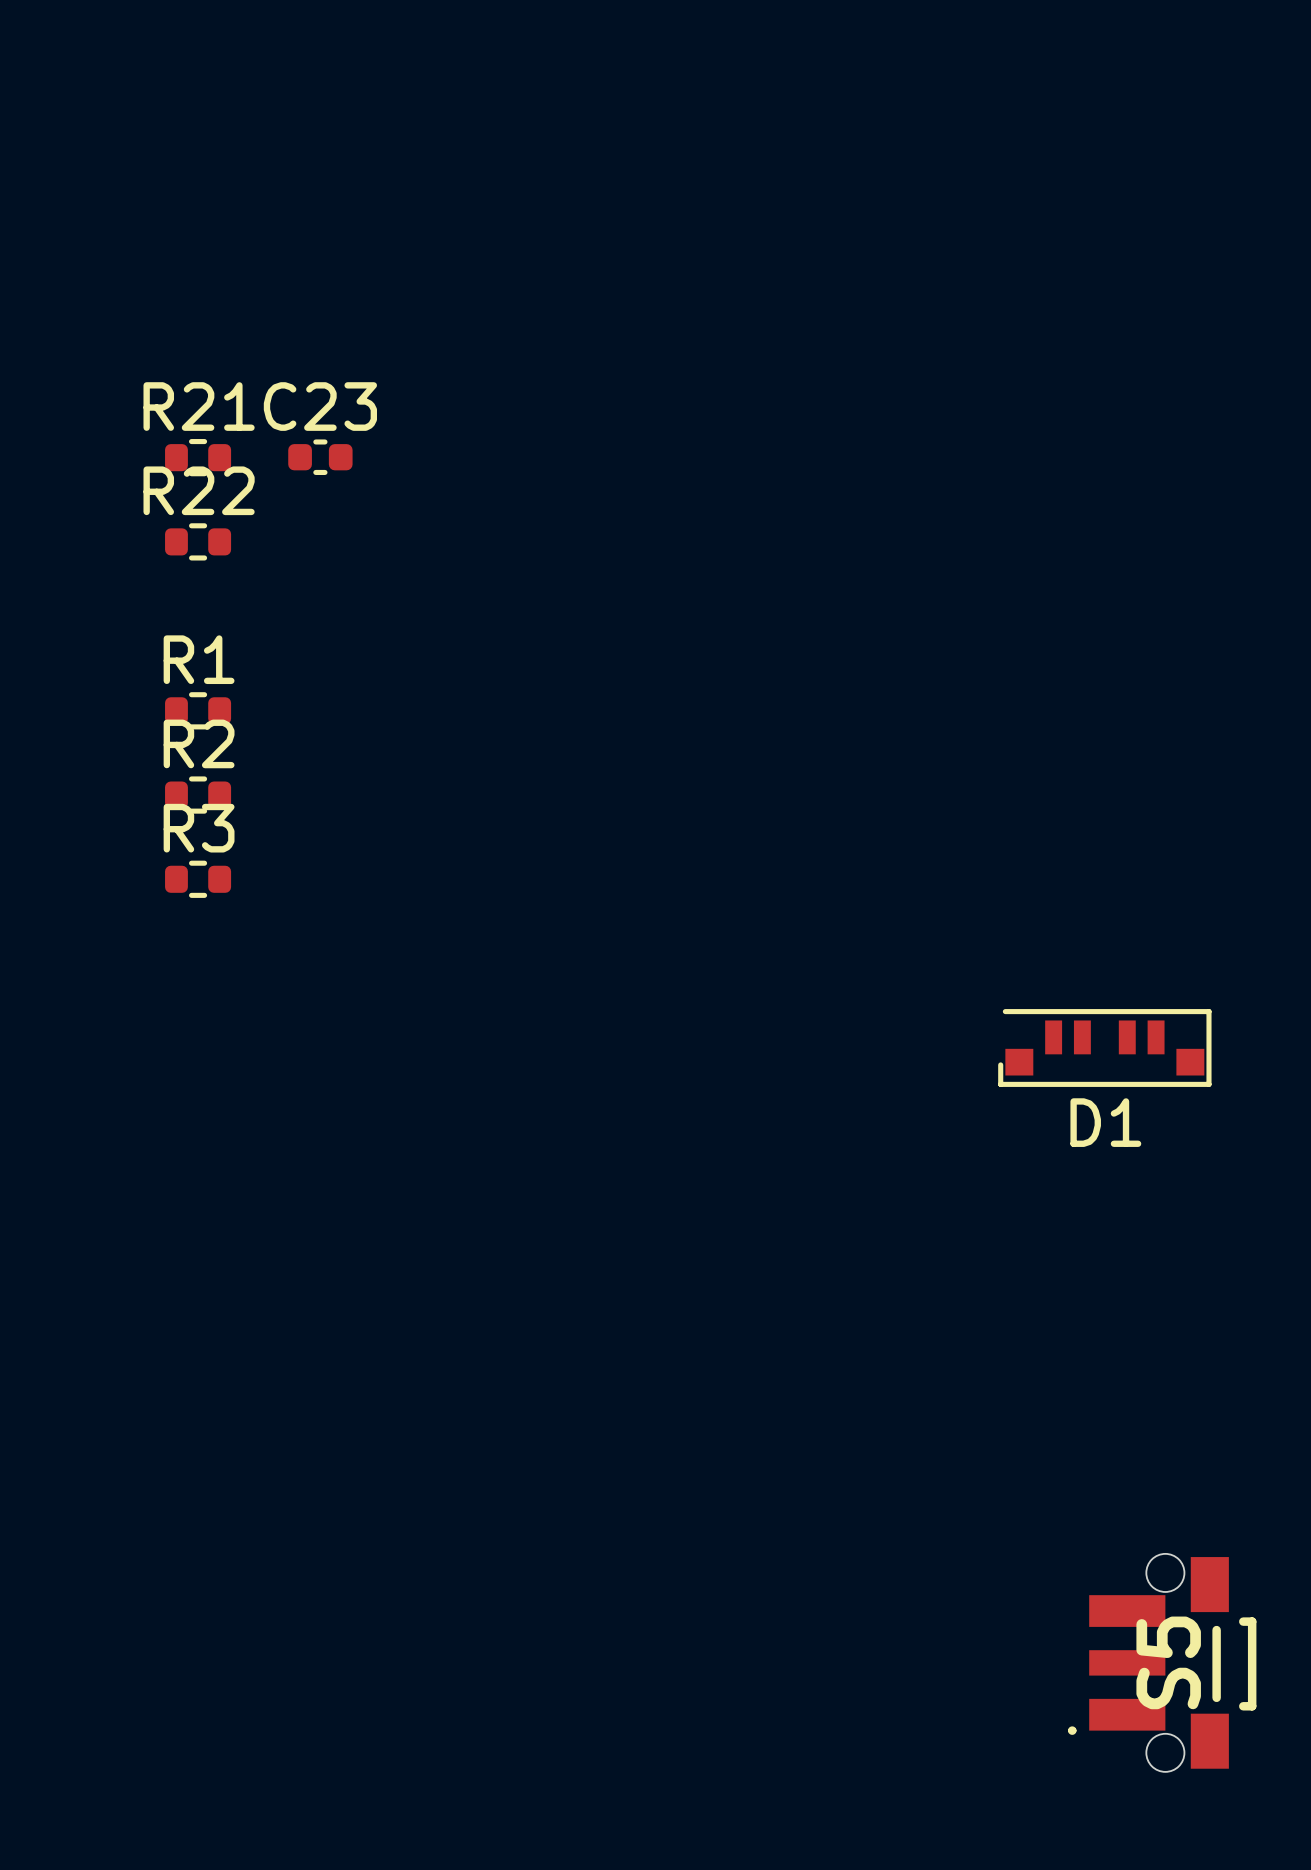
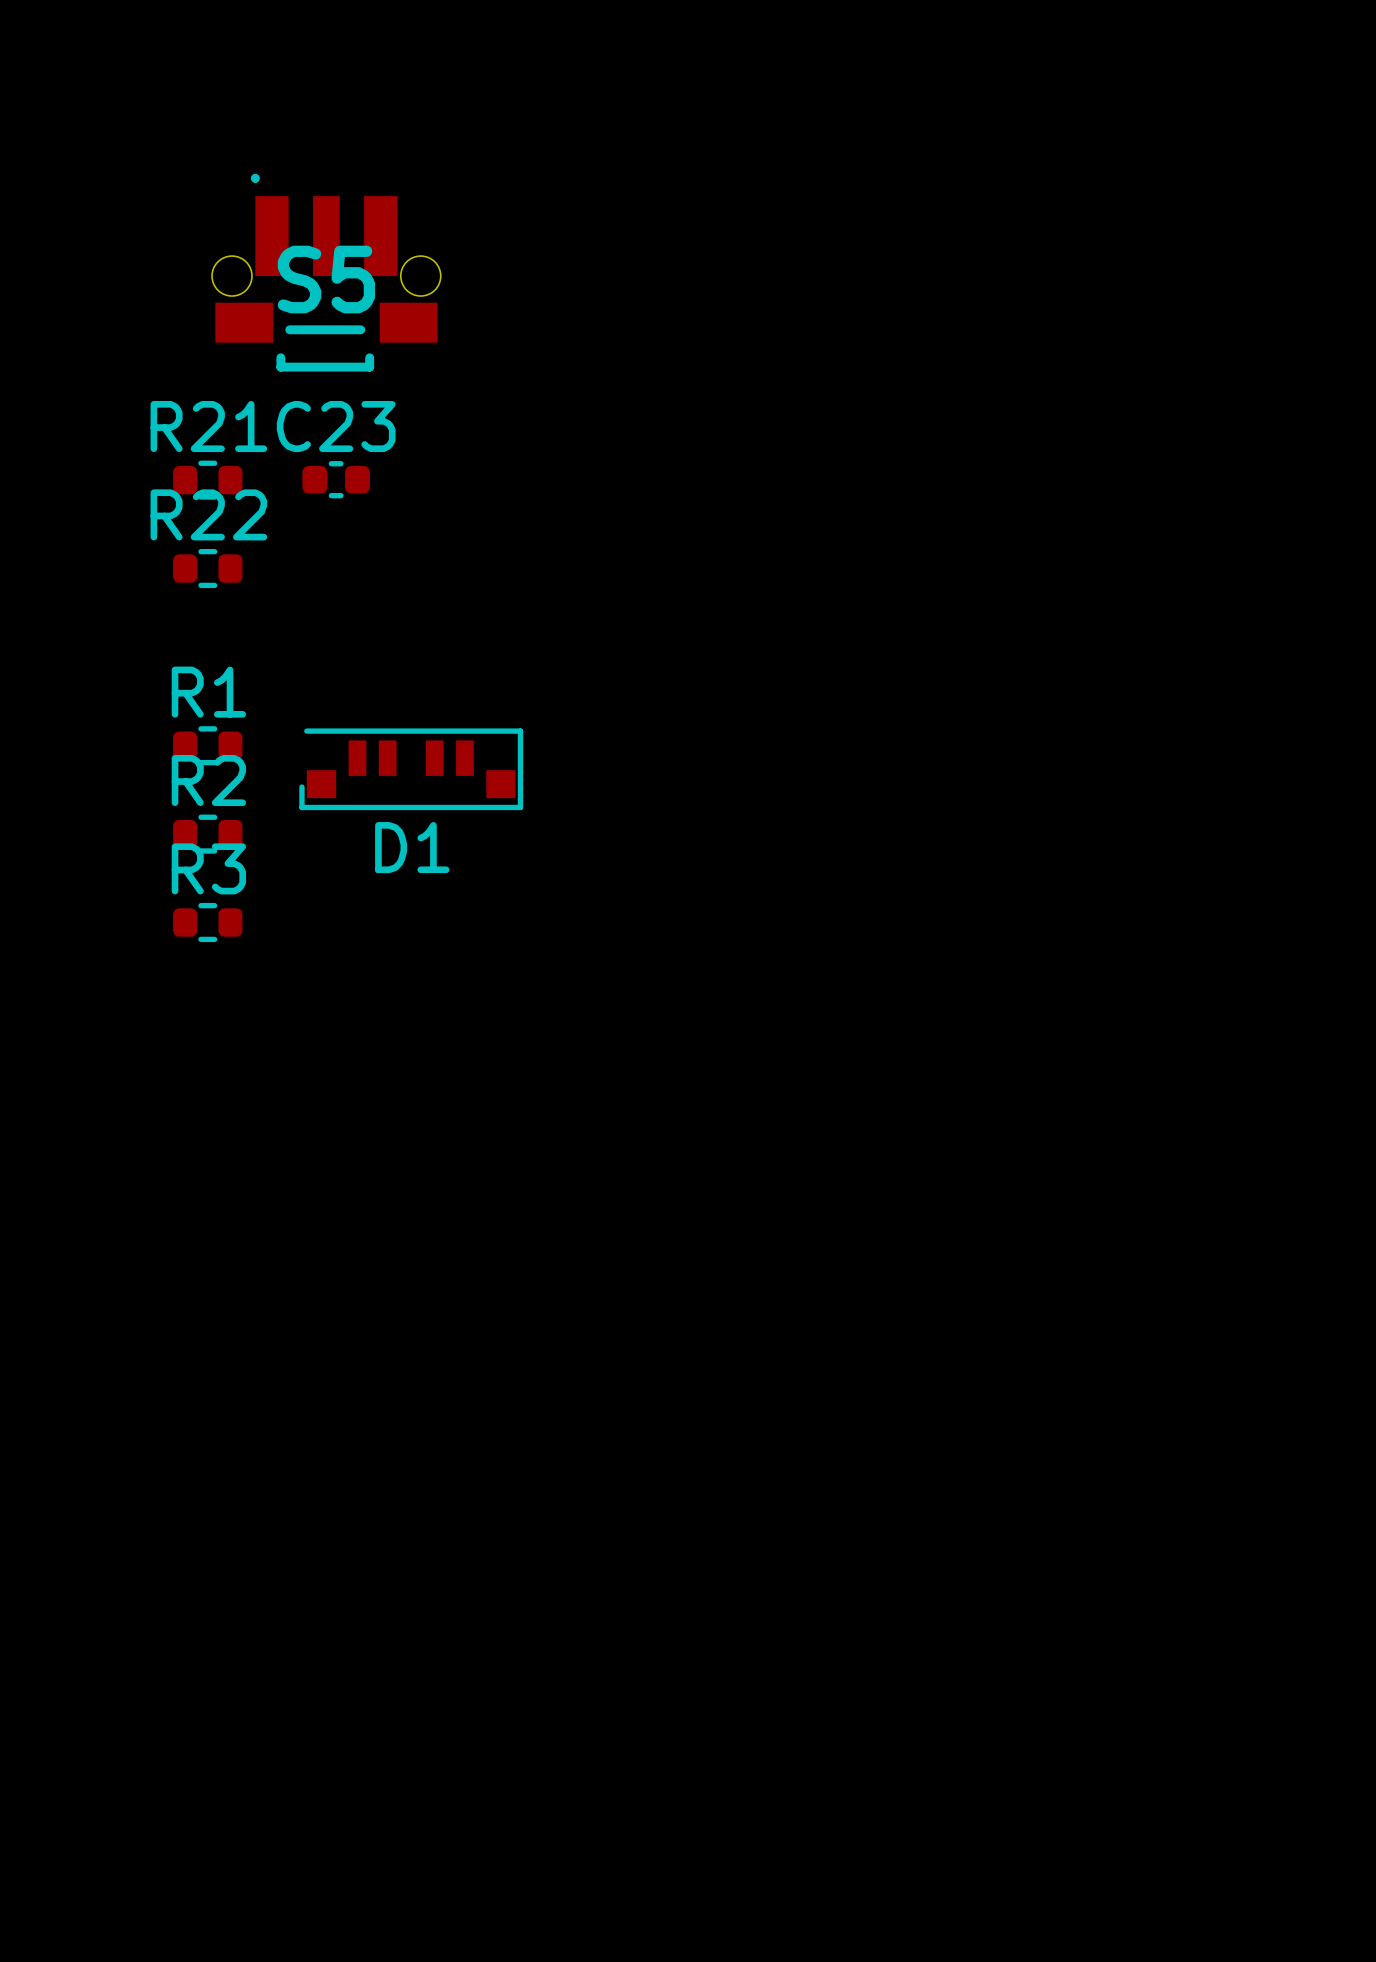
D1 position: (1104, 1047) -> (411, 769)
S5 rotation: 0° (1162, 1662) -> 90° clockwise (326, 272)
S5 position: (1162, 1662) -> (326, 272)

